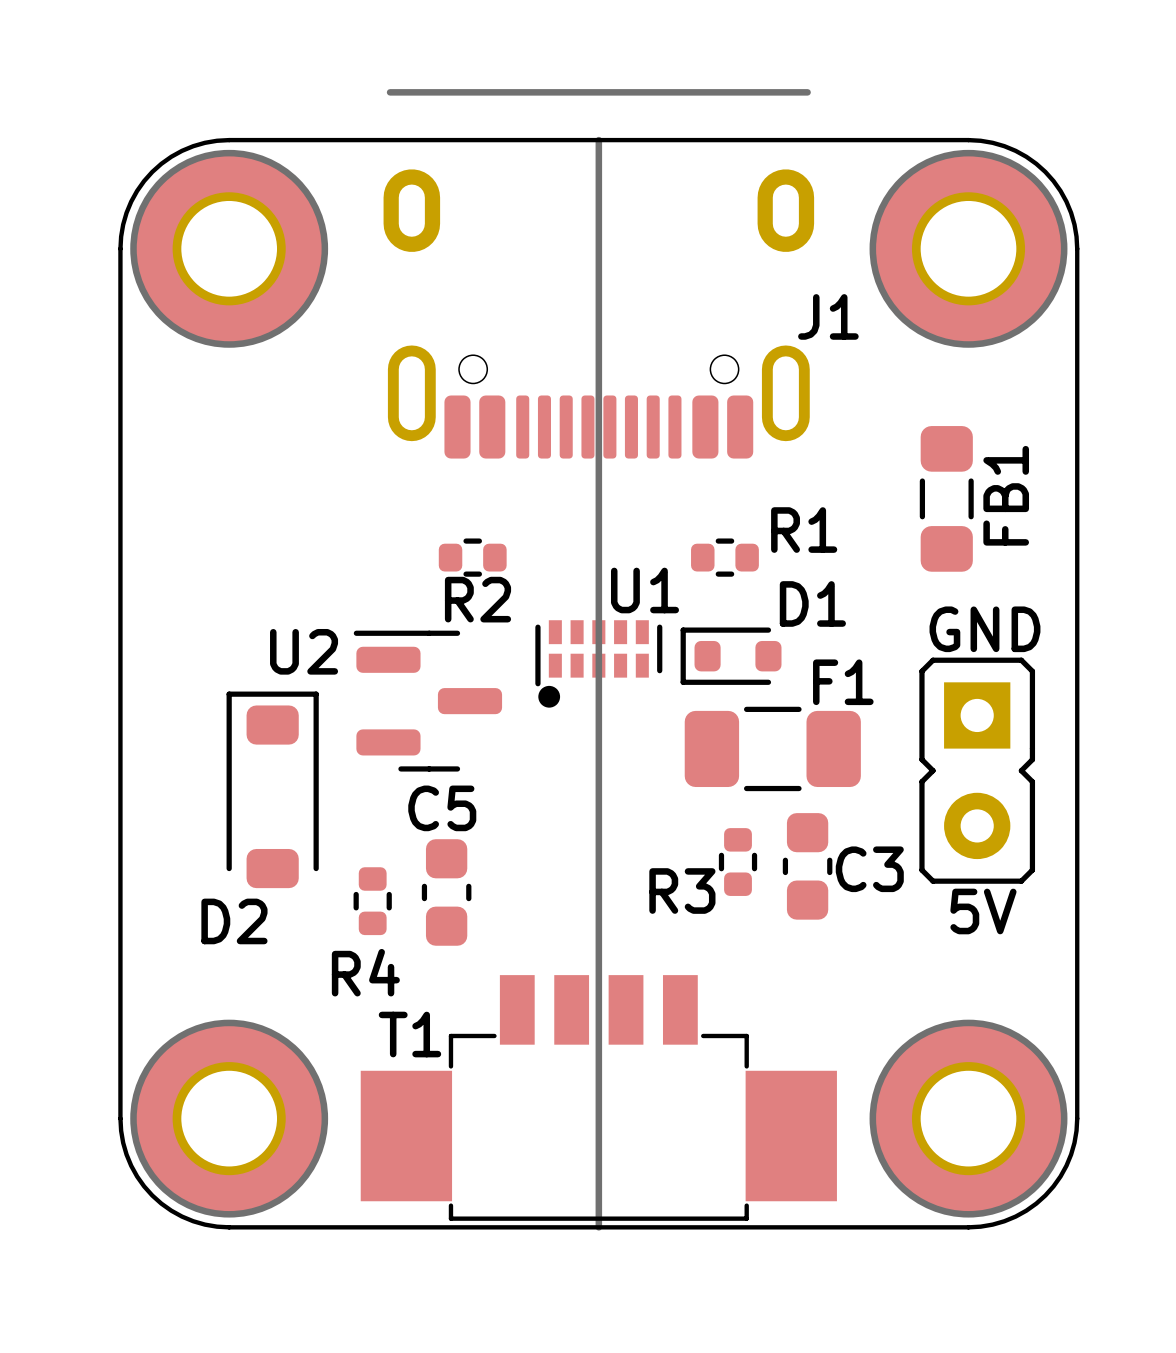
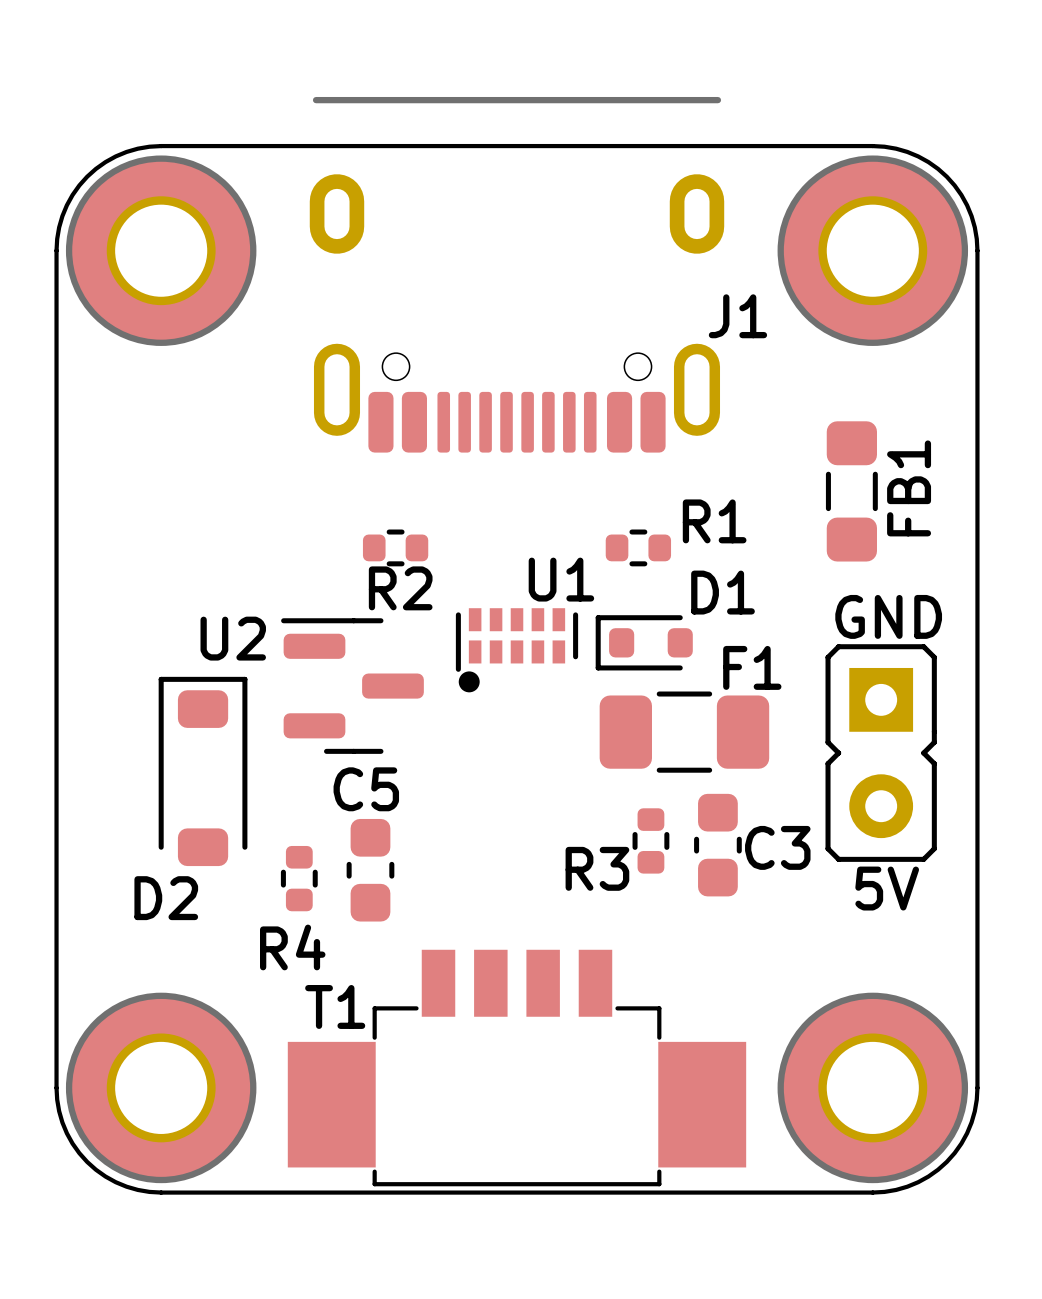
line: (598, 140) (598, 1227) -> none

